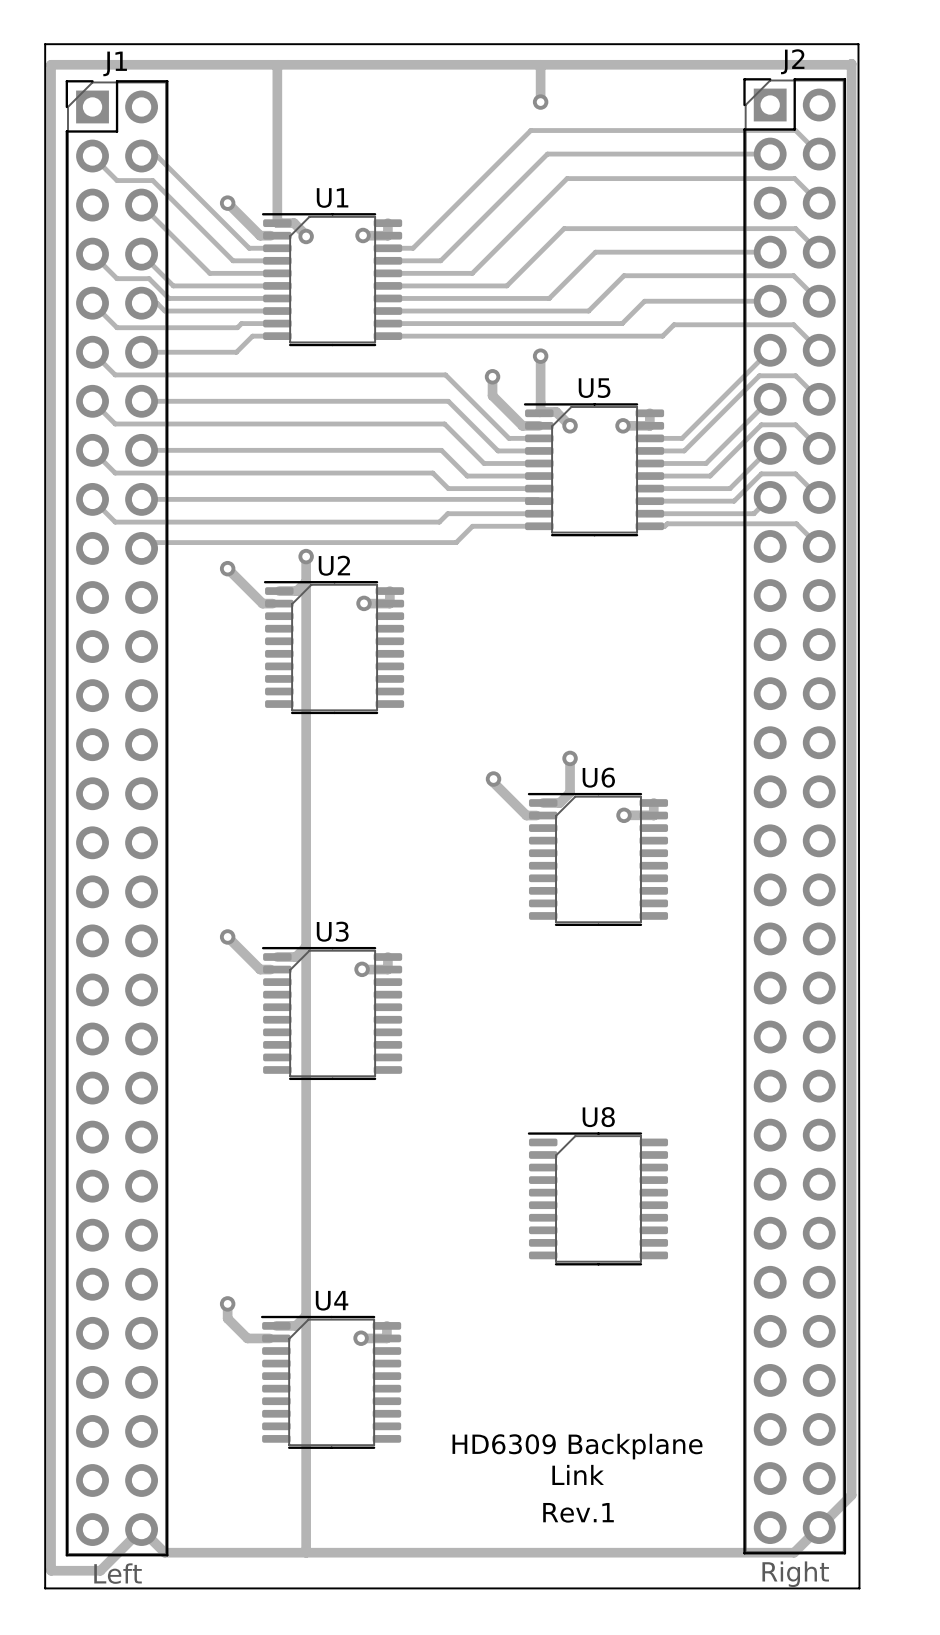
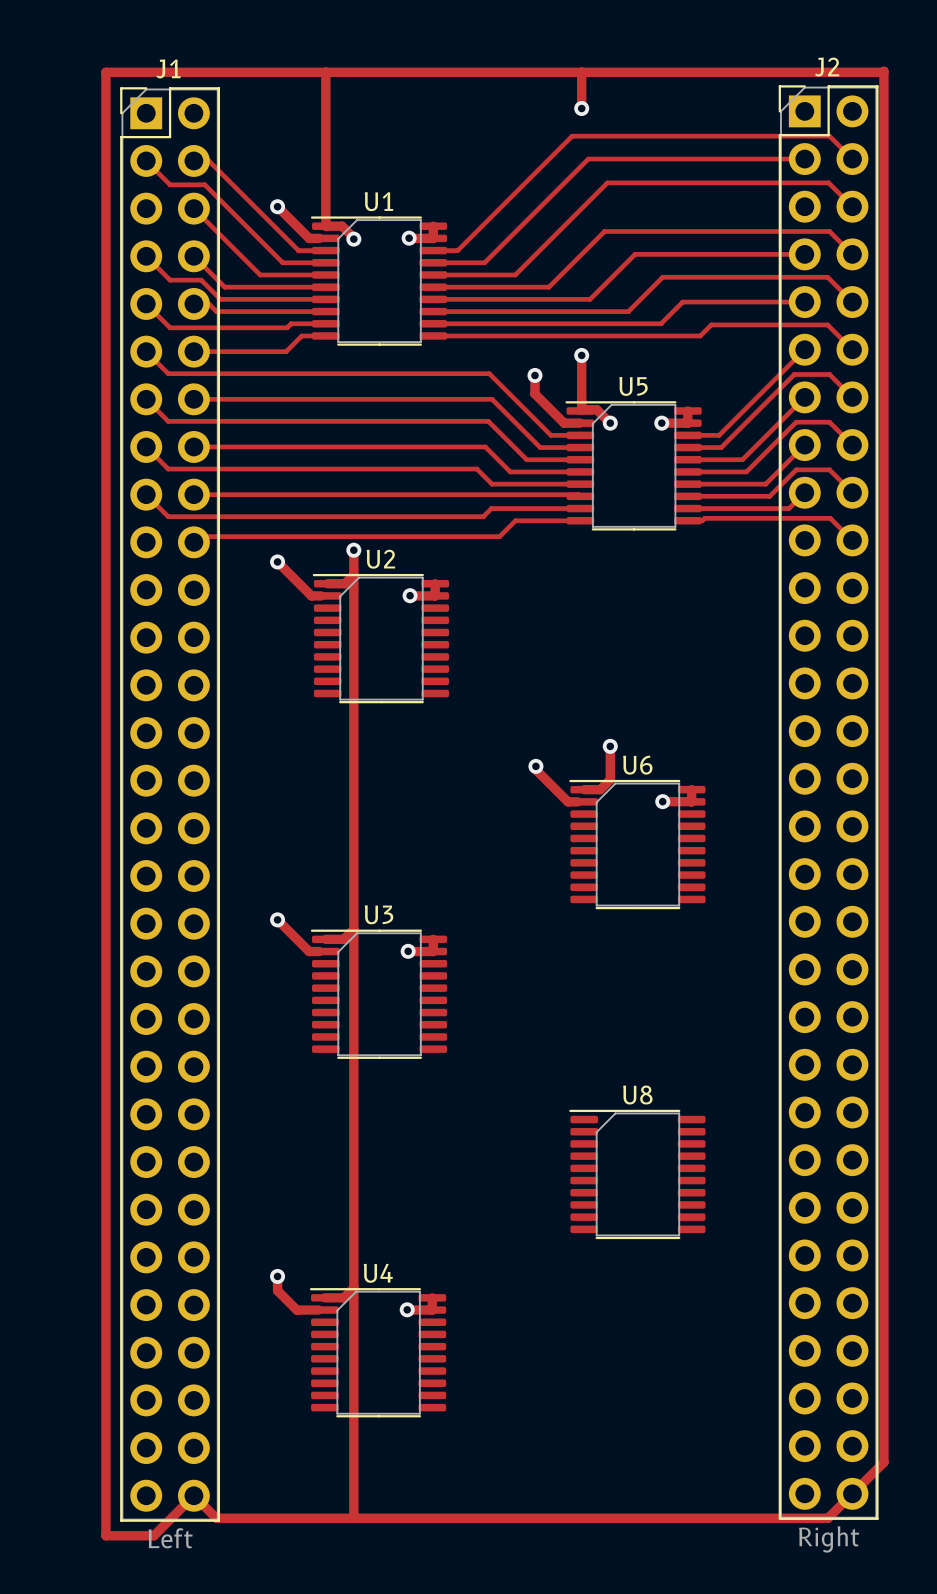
board edge: (45, 44) (858, 44) (859, 1588) (45, 1588) (45, 44) -> none
text: HD6309 Backplane (577, 1446) -> none
text: Link (578, 1474) -> none
text: Rev.1 (578, 1512) -> none

